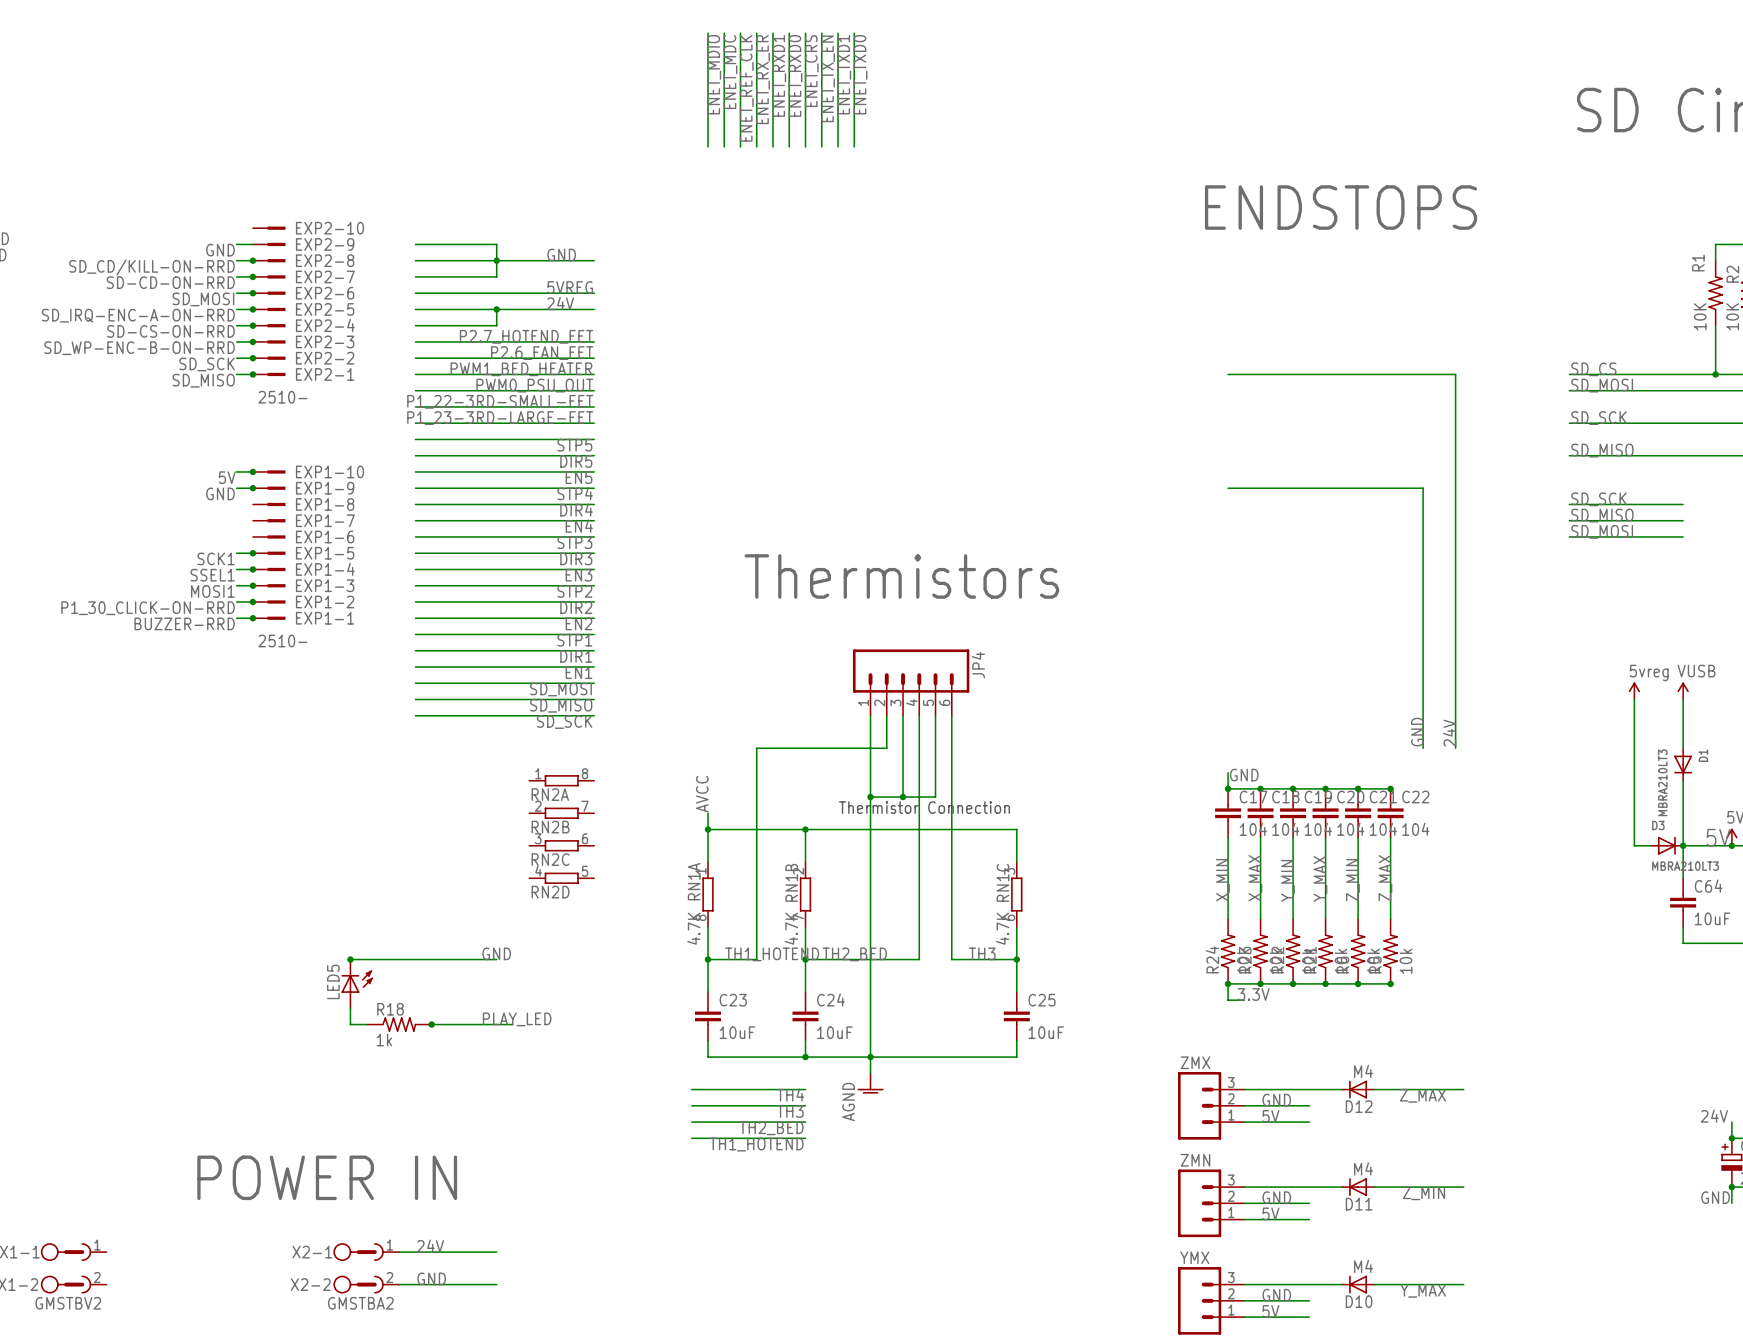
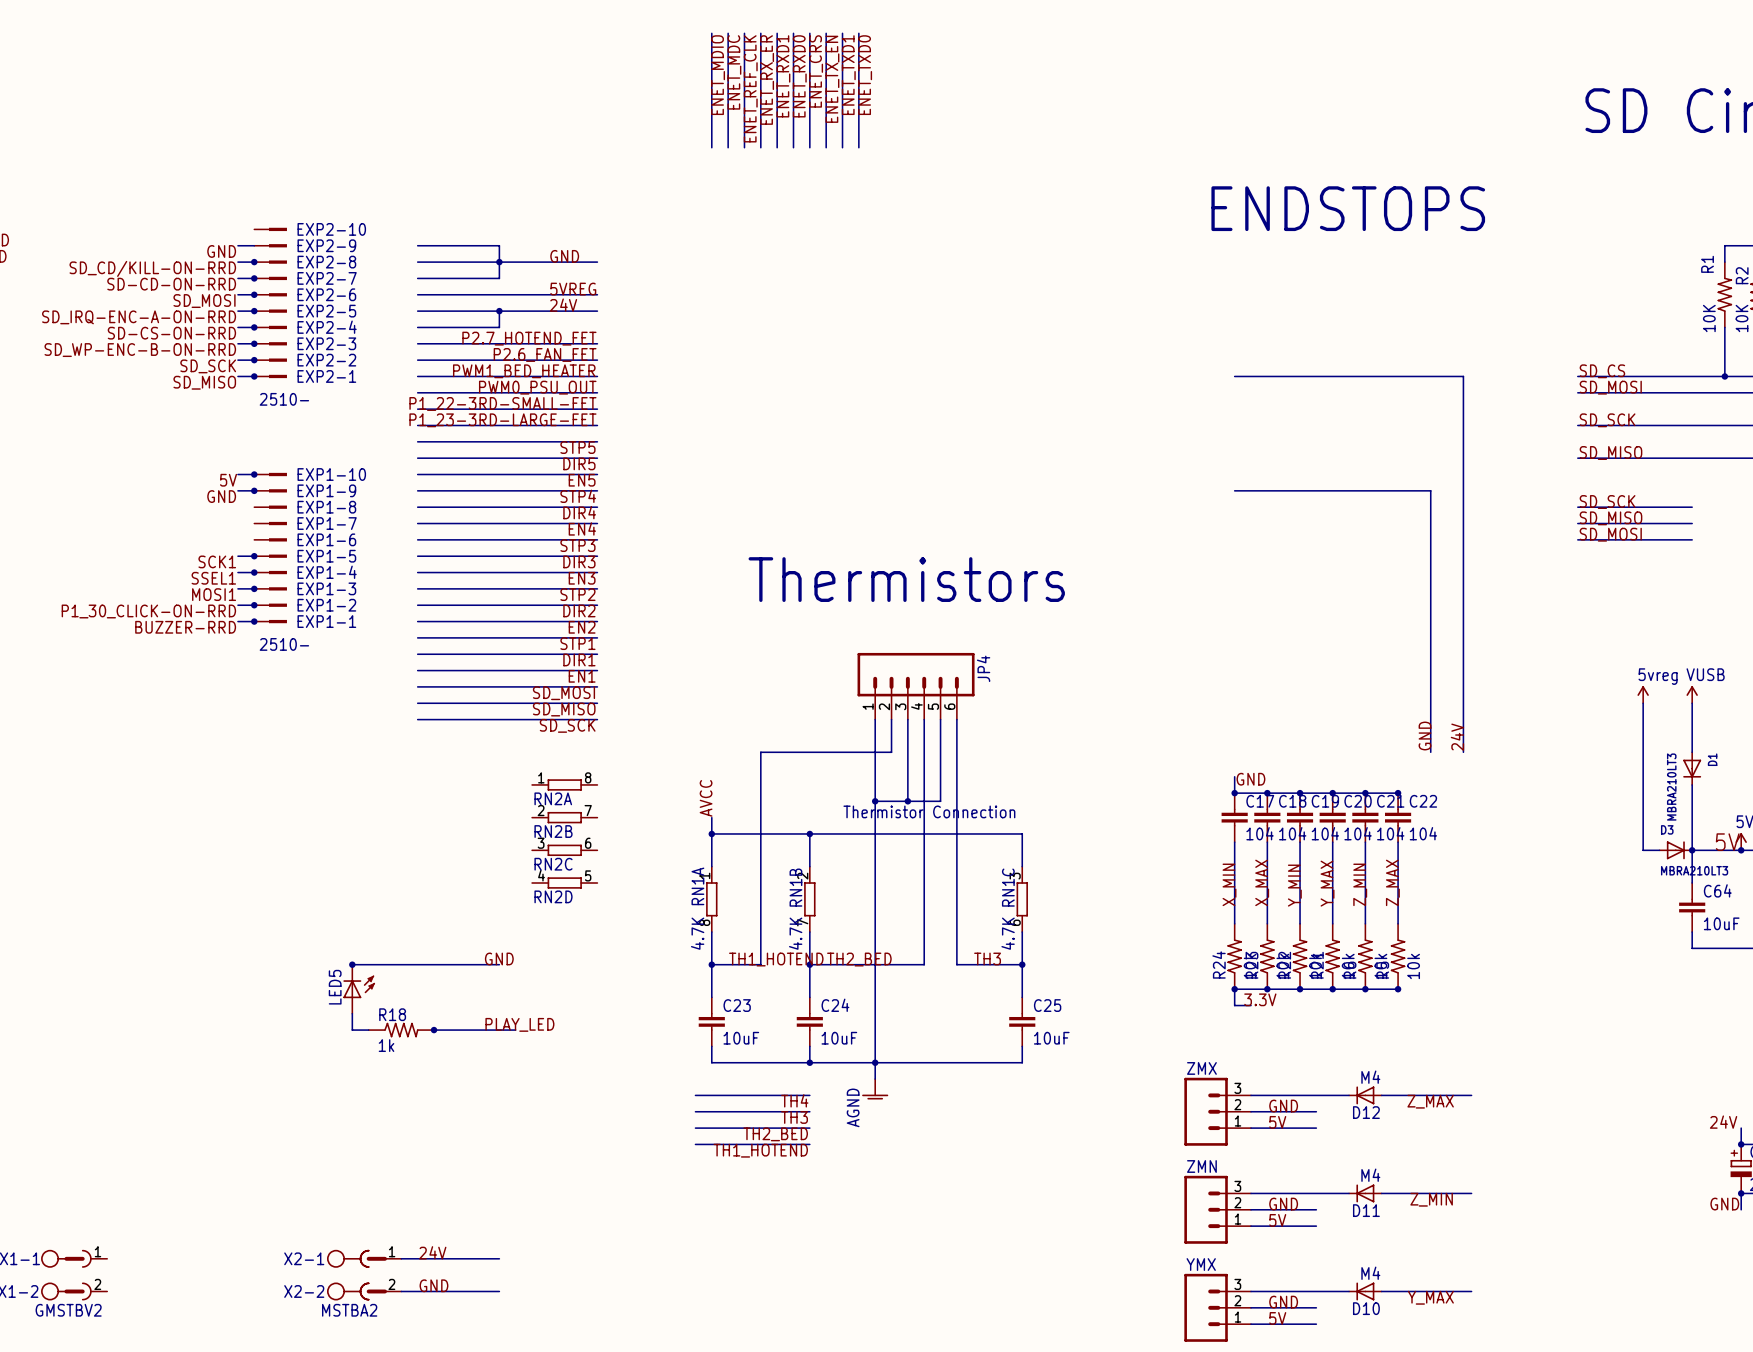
text: POWER IN (327, 1177) -> none
X2-1 symbol: [333, 1243, 400, 1262] -> [327, 1249, 402, 1268]
X2-2 symbol: [333, 1275, 400, 1294] -> [327, 1282, 402, 1301]
X2-2 value: GMSTBA2 (360, 1303) -> MSTBA2 (349, 1310)

